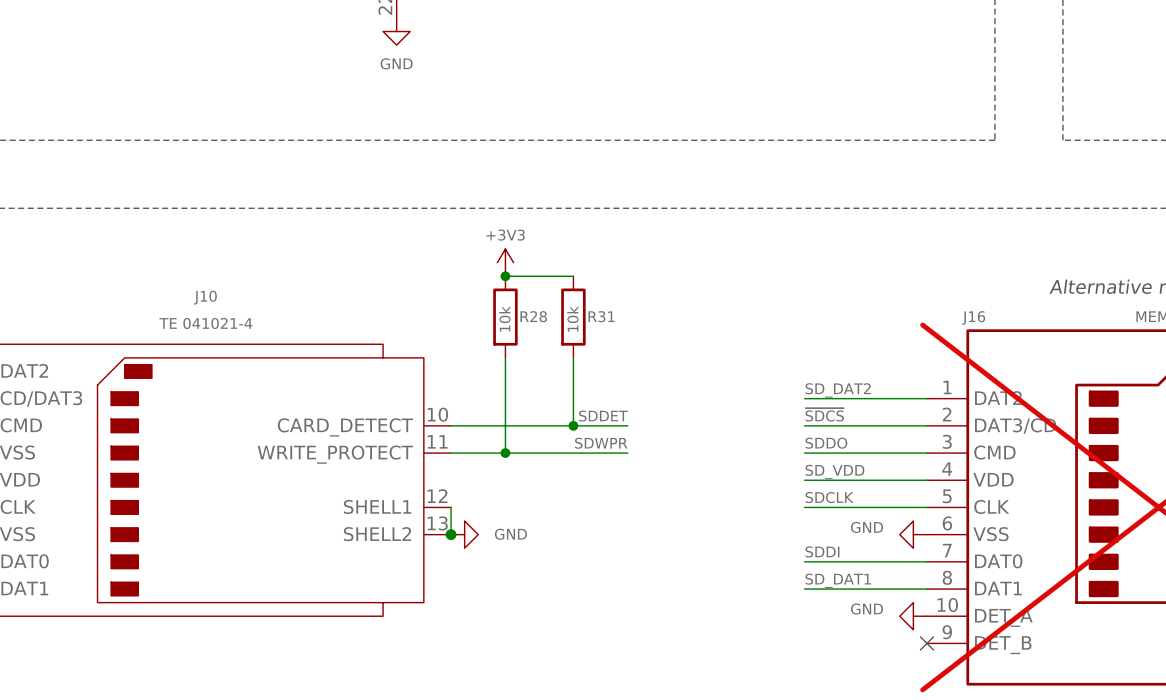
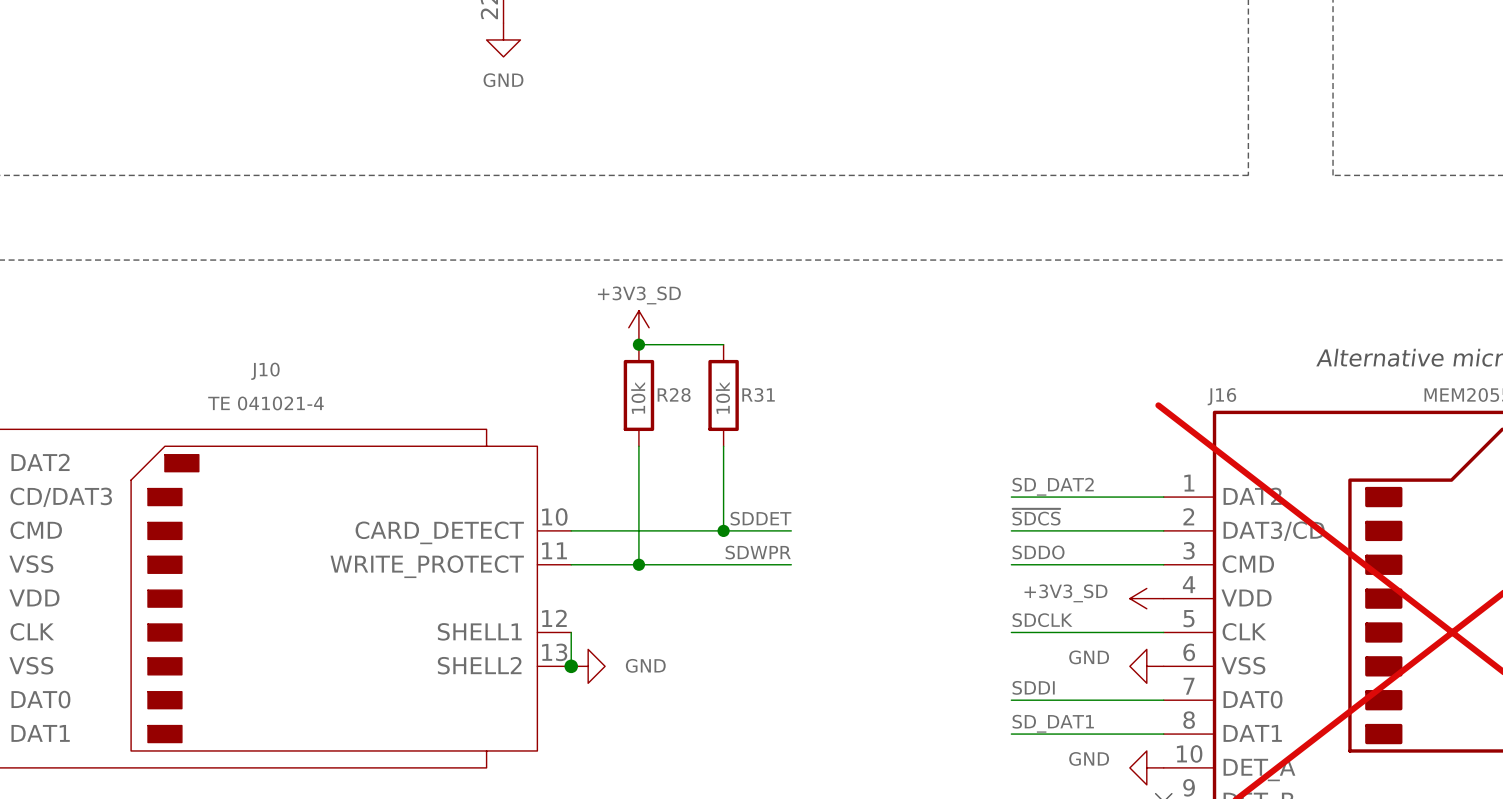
power symbol: +3V3 (505, 262) -> +3V3_SD (638, 327)
label: SD_VDD (834, 471) -> none
wire: (804, 480) (926, 480) -> none
power symbol: none -> +3V3_SD (1146, 598)

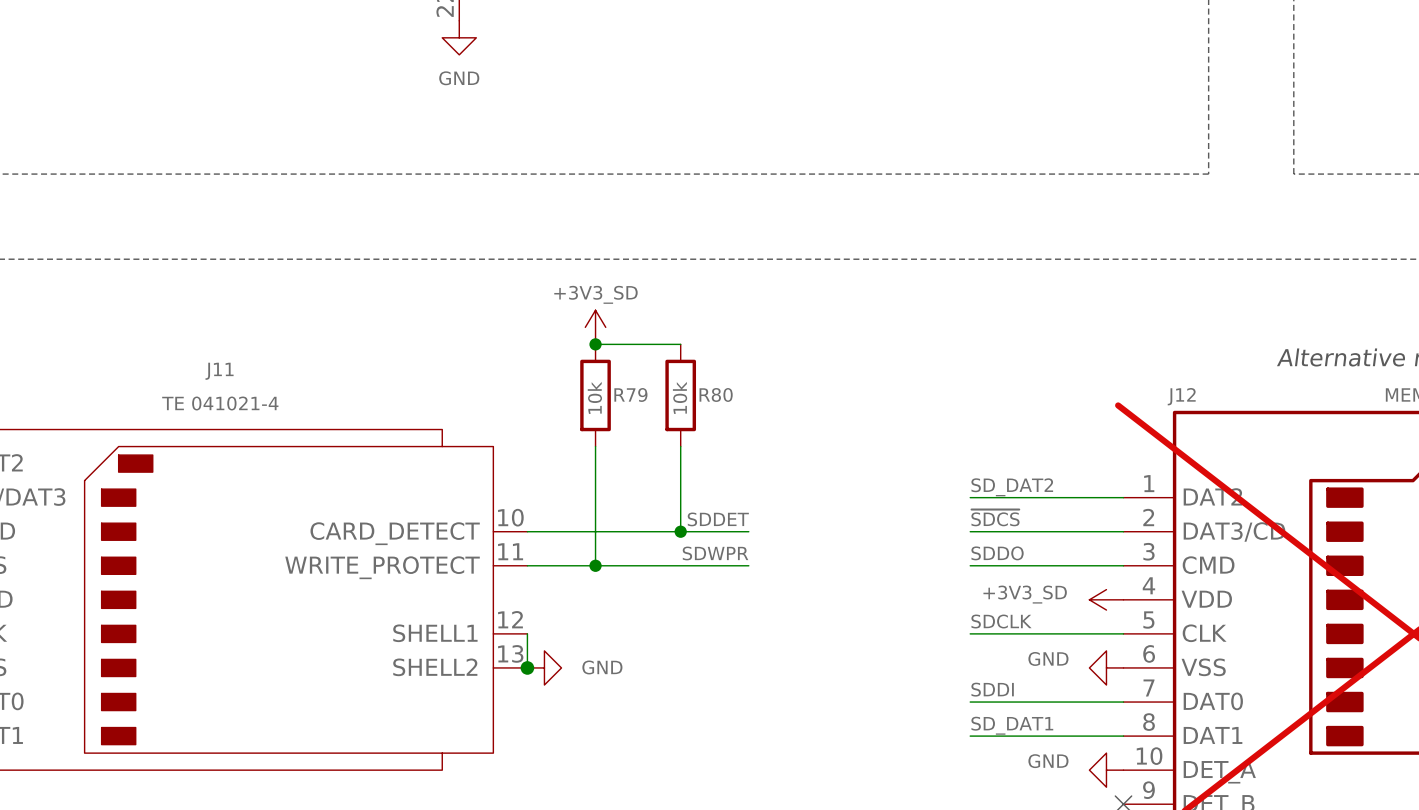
J10 name: J10 (265, 371) -> J11 (219, 371)
R28 name: R28 (674, 394) -> R79 (630, 394)
R31 name: R31 (758, 394) -> R80 (716, 394)
J16 name: J16 (1221, 396) -> J12 (1181, 396)

